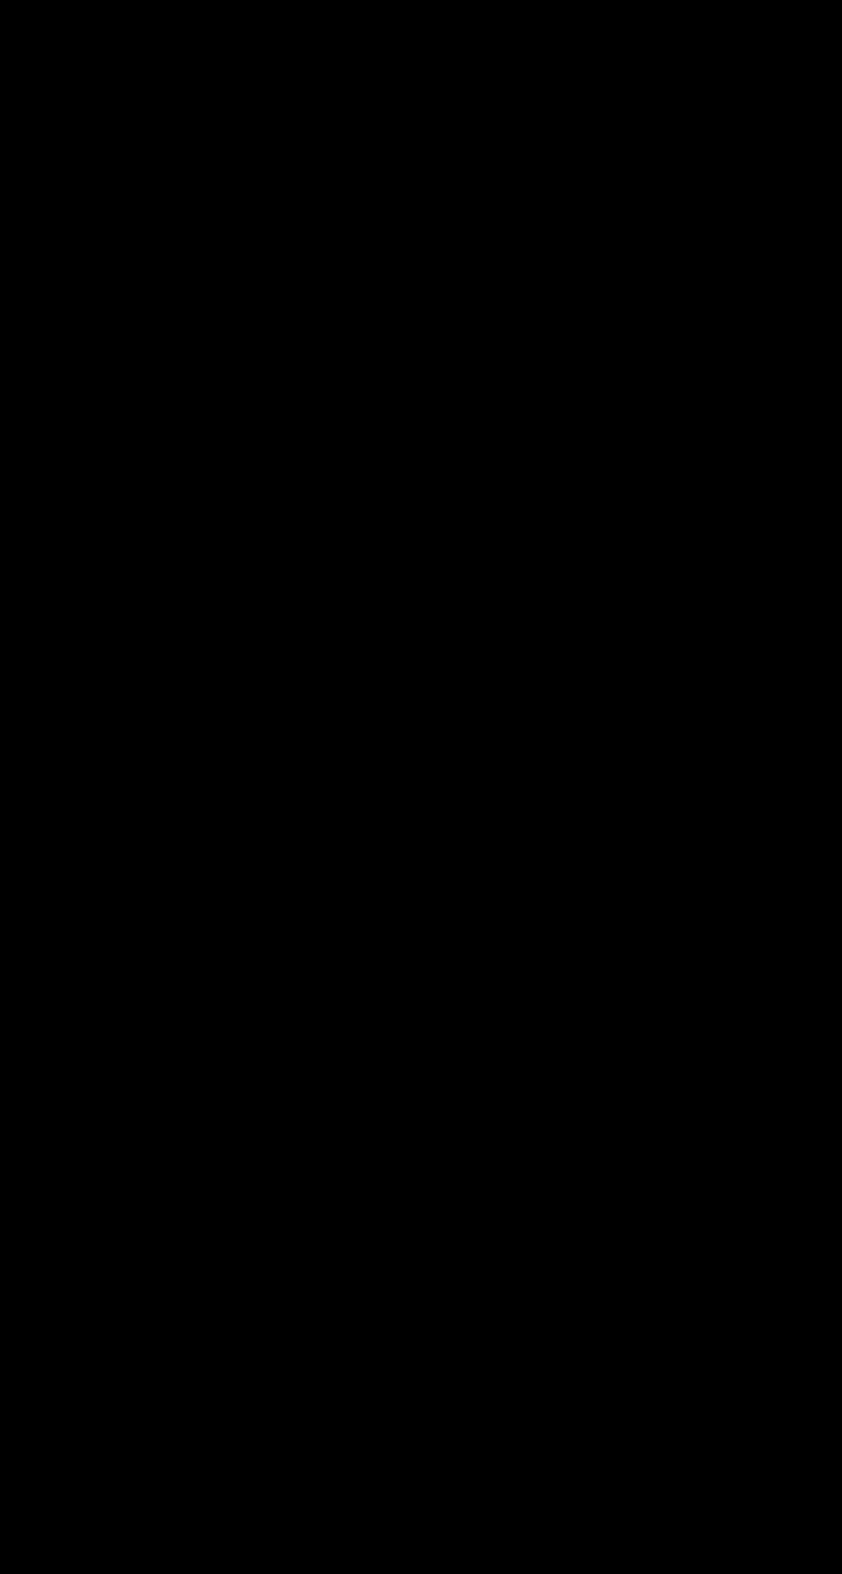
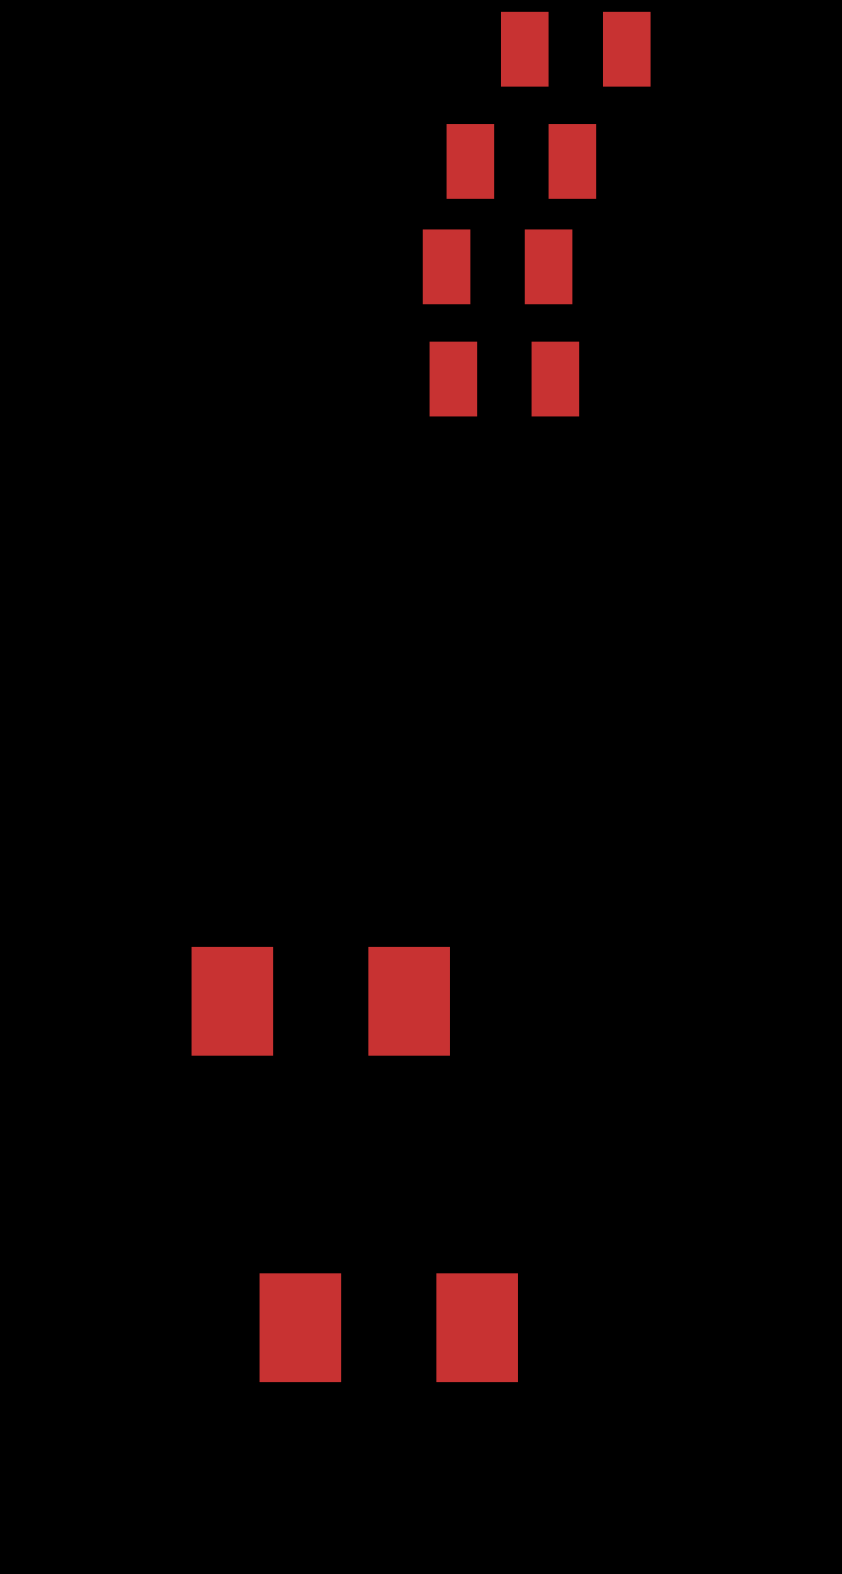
part: none -> (575, 49)
part: none -> (521, 161)
part: none -> (497, 266)
part: none -> (504, 379)
part: none -> (320, 1001)
part: none -> (388, 1327)

